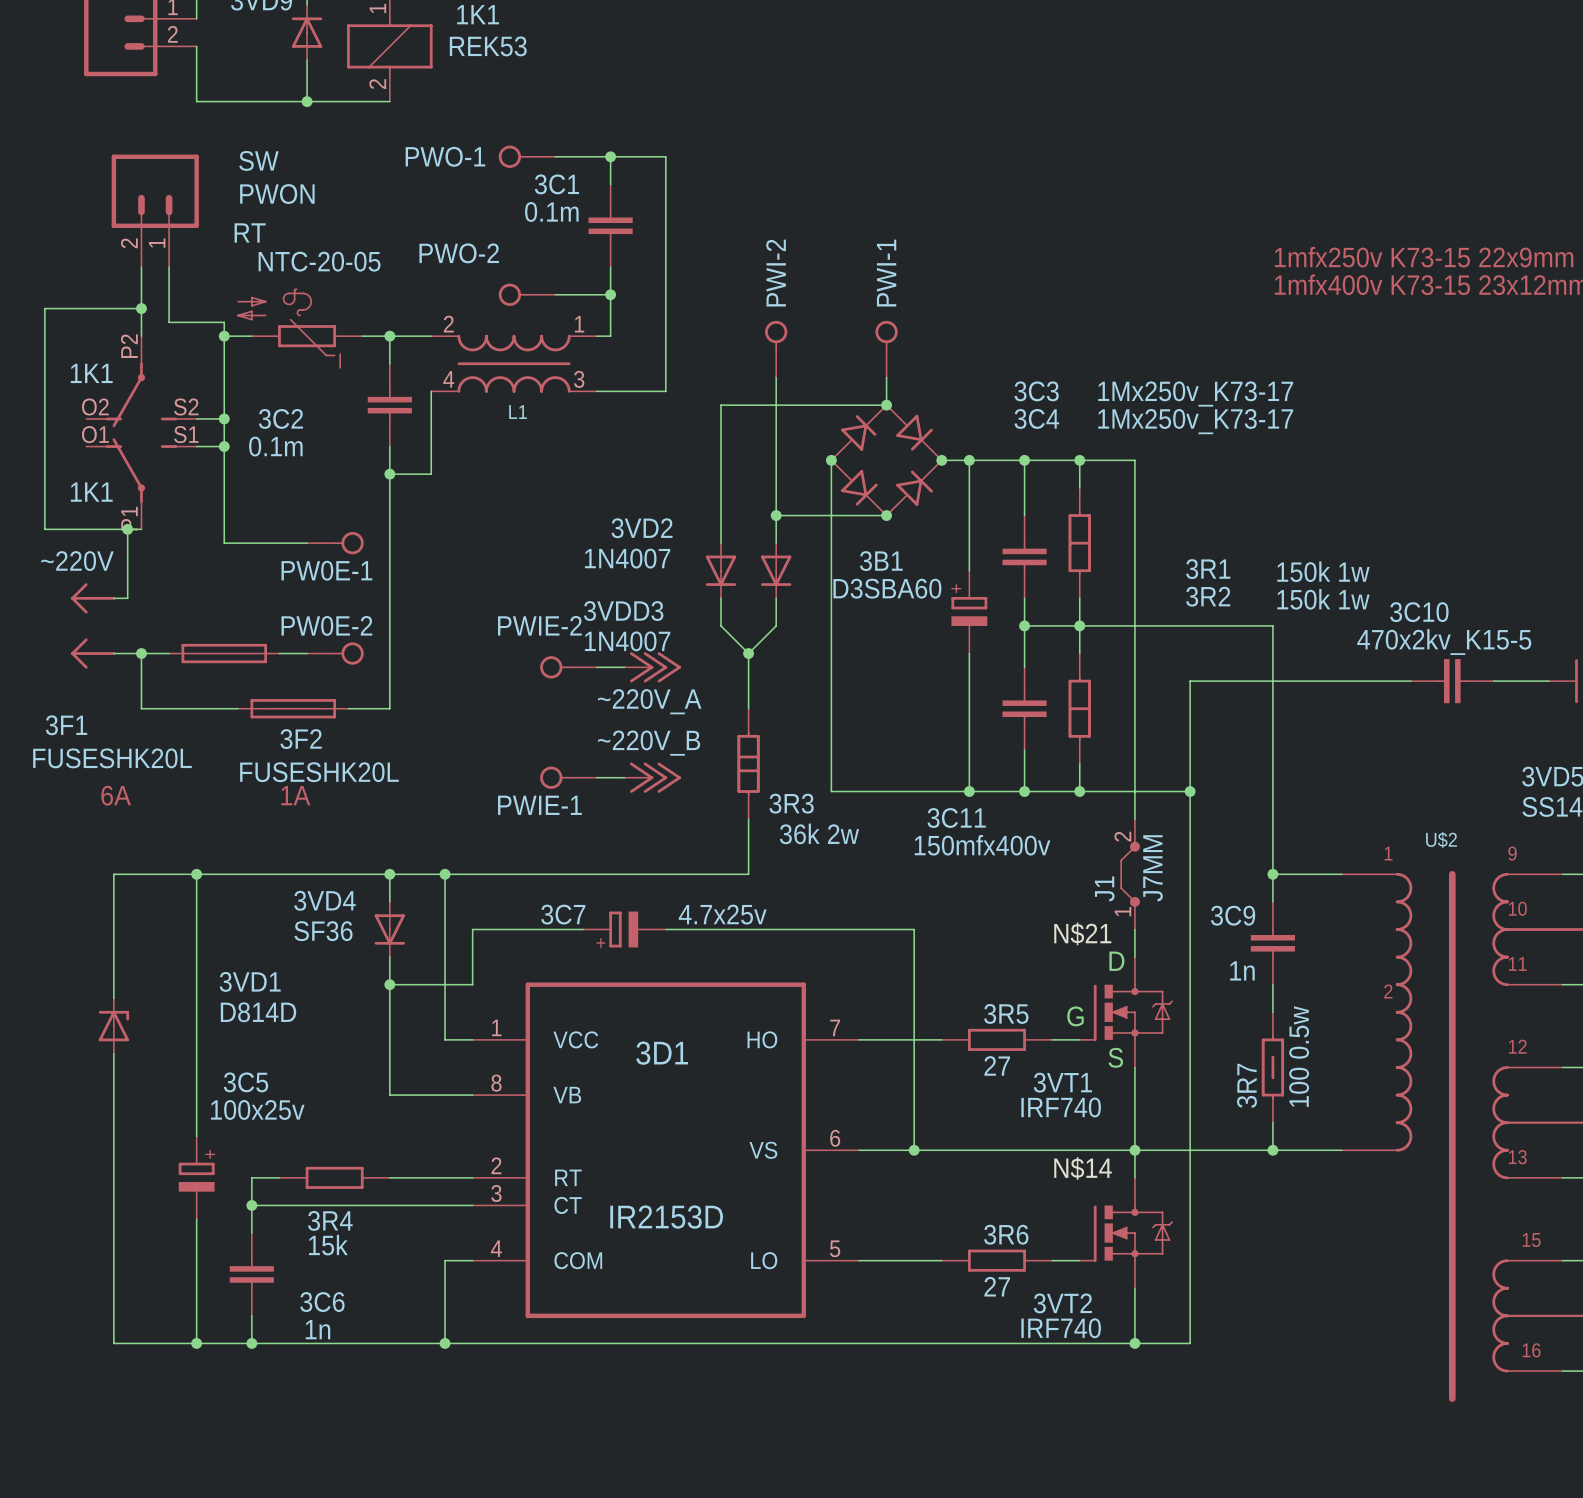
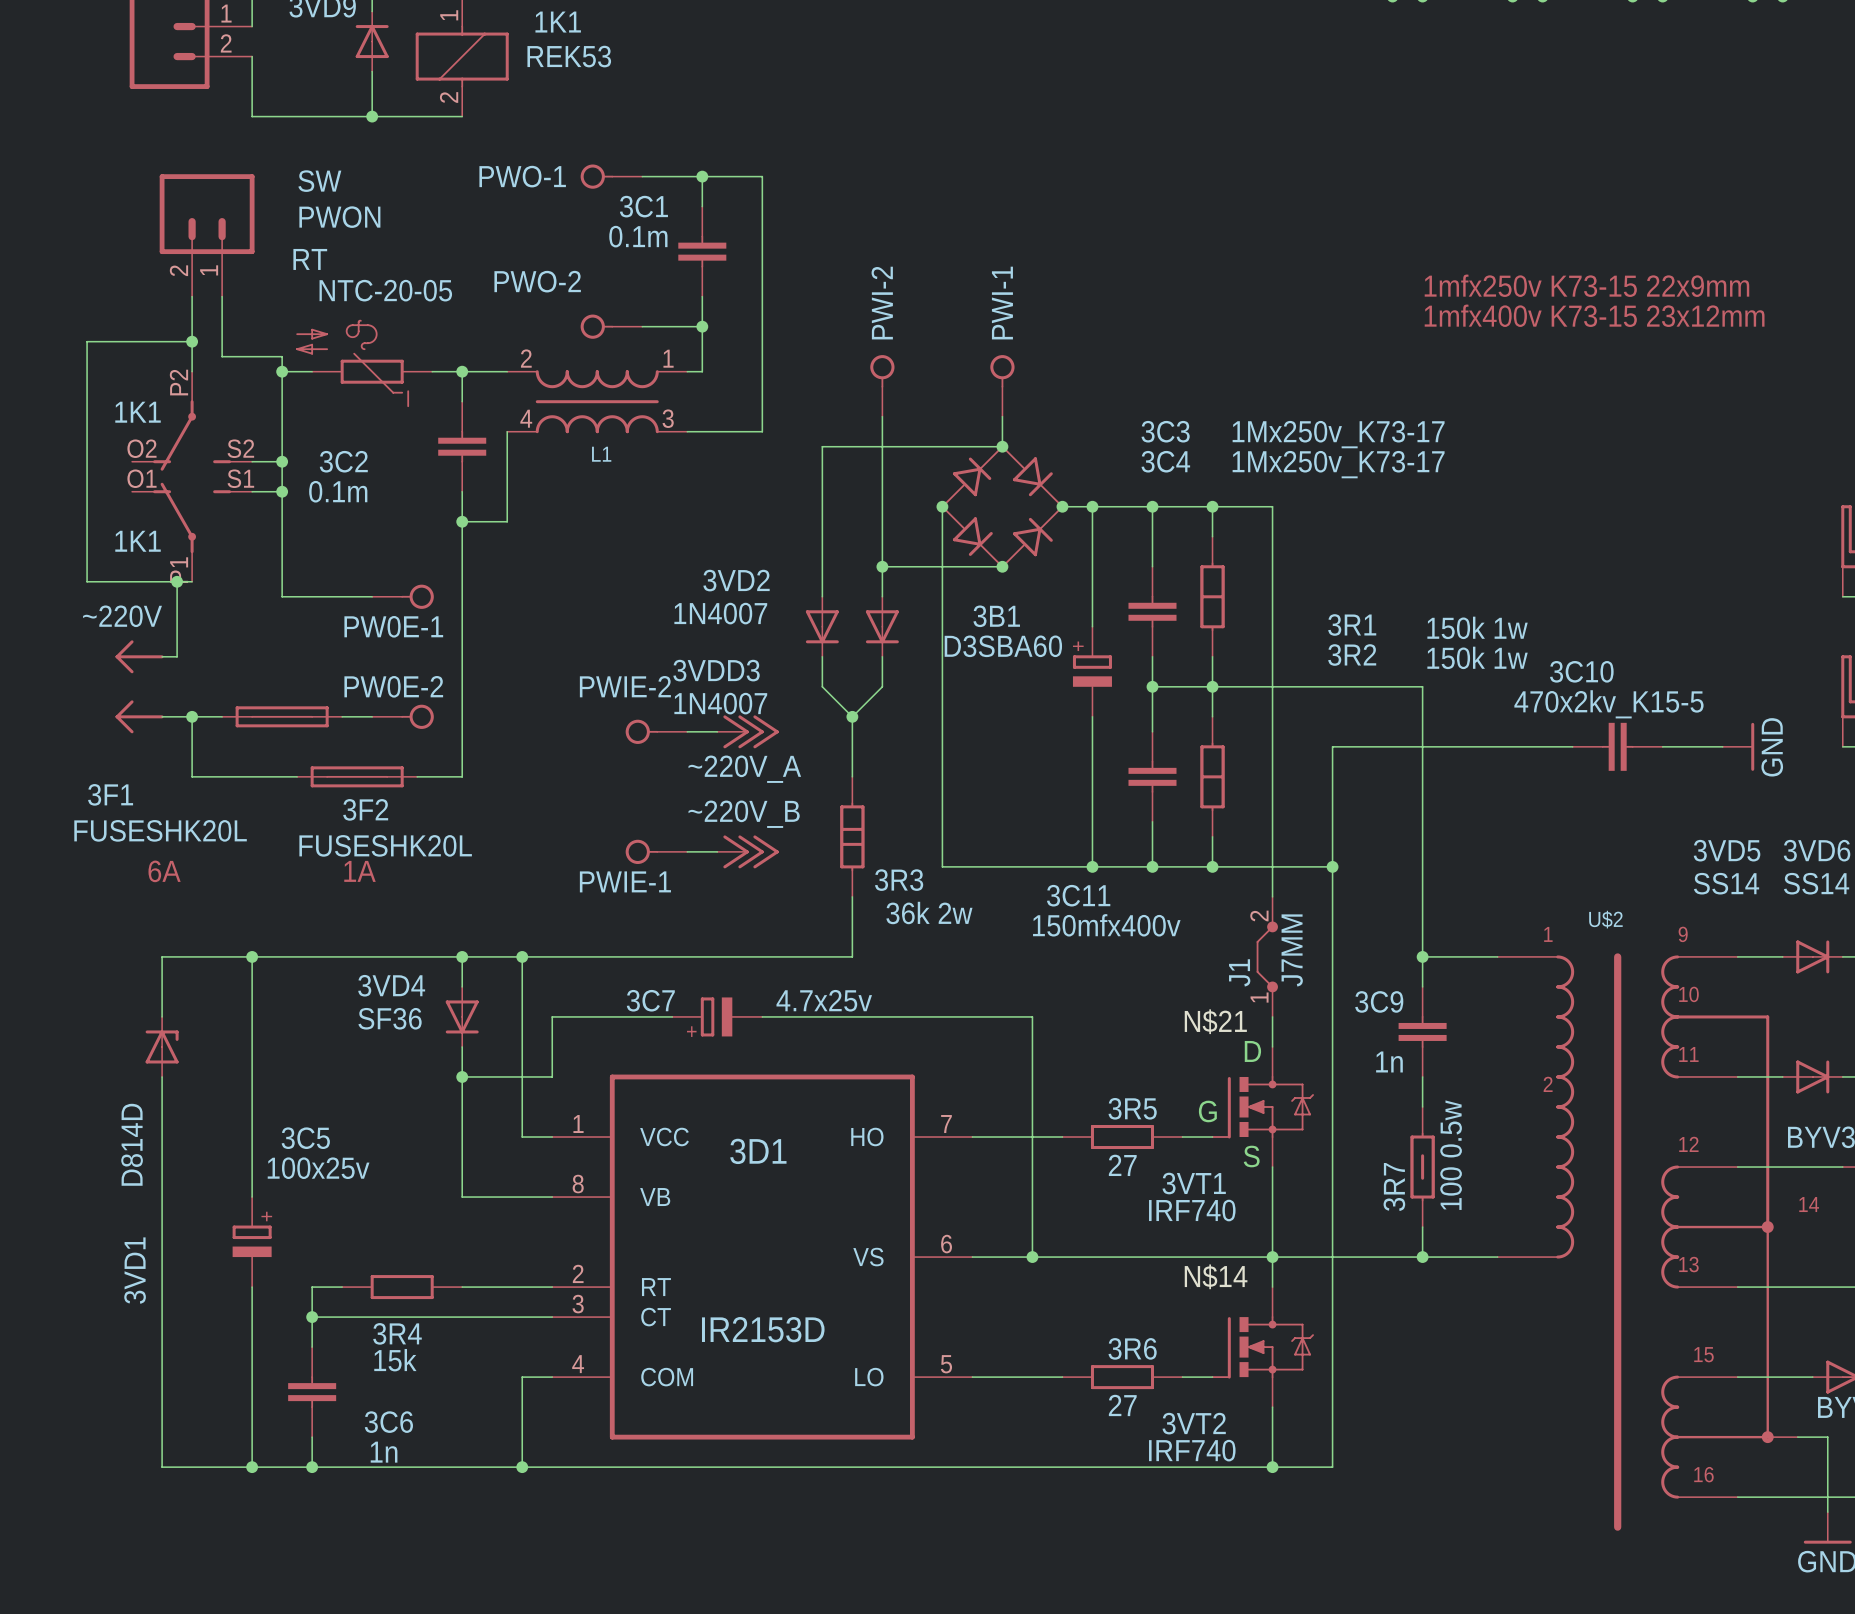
3VD1 name rotation: 0° (250, 981) -> 90° counterclockwise (135, 1270)
3VD1 name position: 3VD1 (250, 981) -> 3VD1 (135, 1270)
3VD1 value rotation: 0° (258, 1012) -> 90° counterclockwise (132, 1144)
3VD1 value position: D814D (258, 1012) -> D814D (132, 1144)
3VD1 position: (113, 1026) -> (162, 1046)
3C5 position: (196, 1177) -> (252, 1242)

